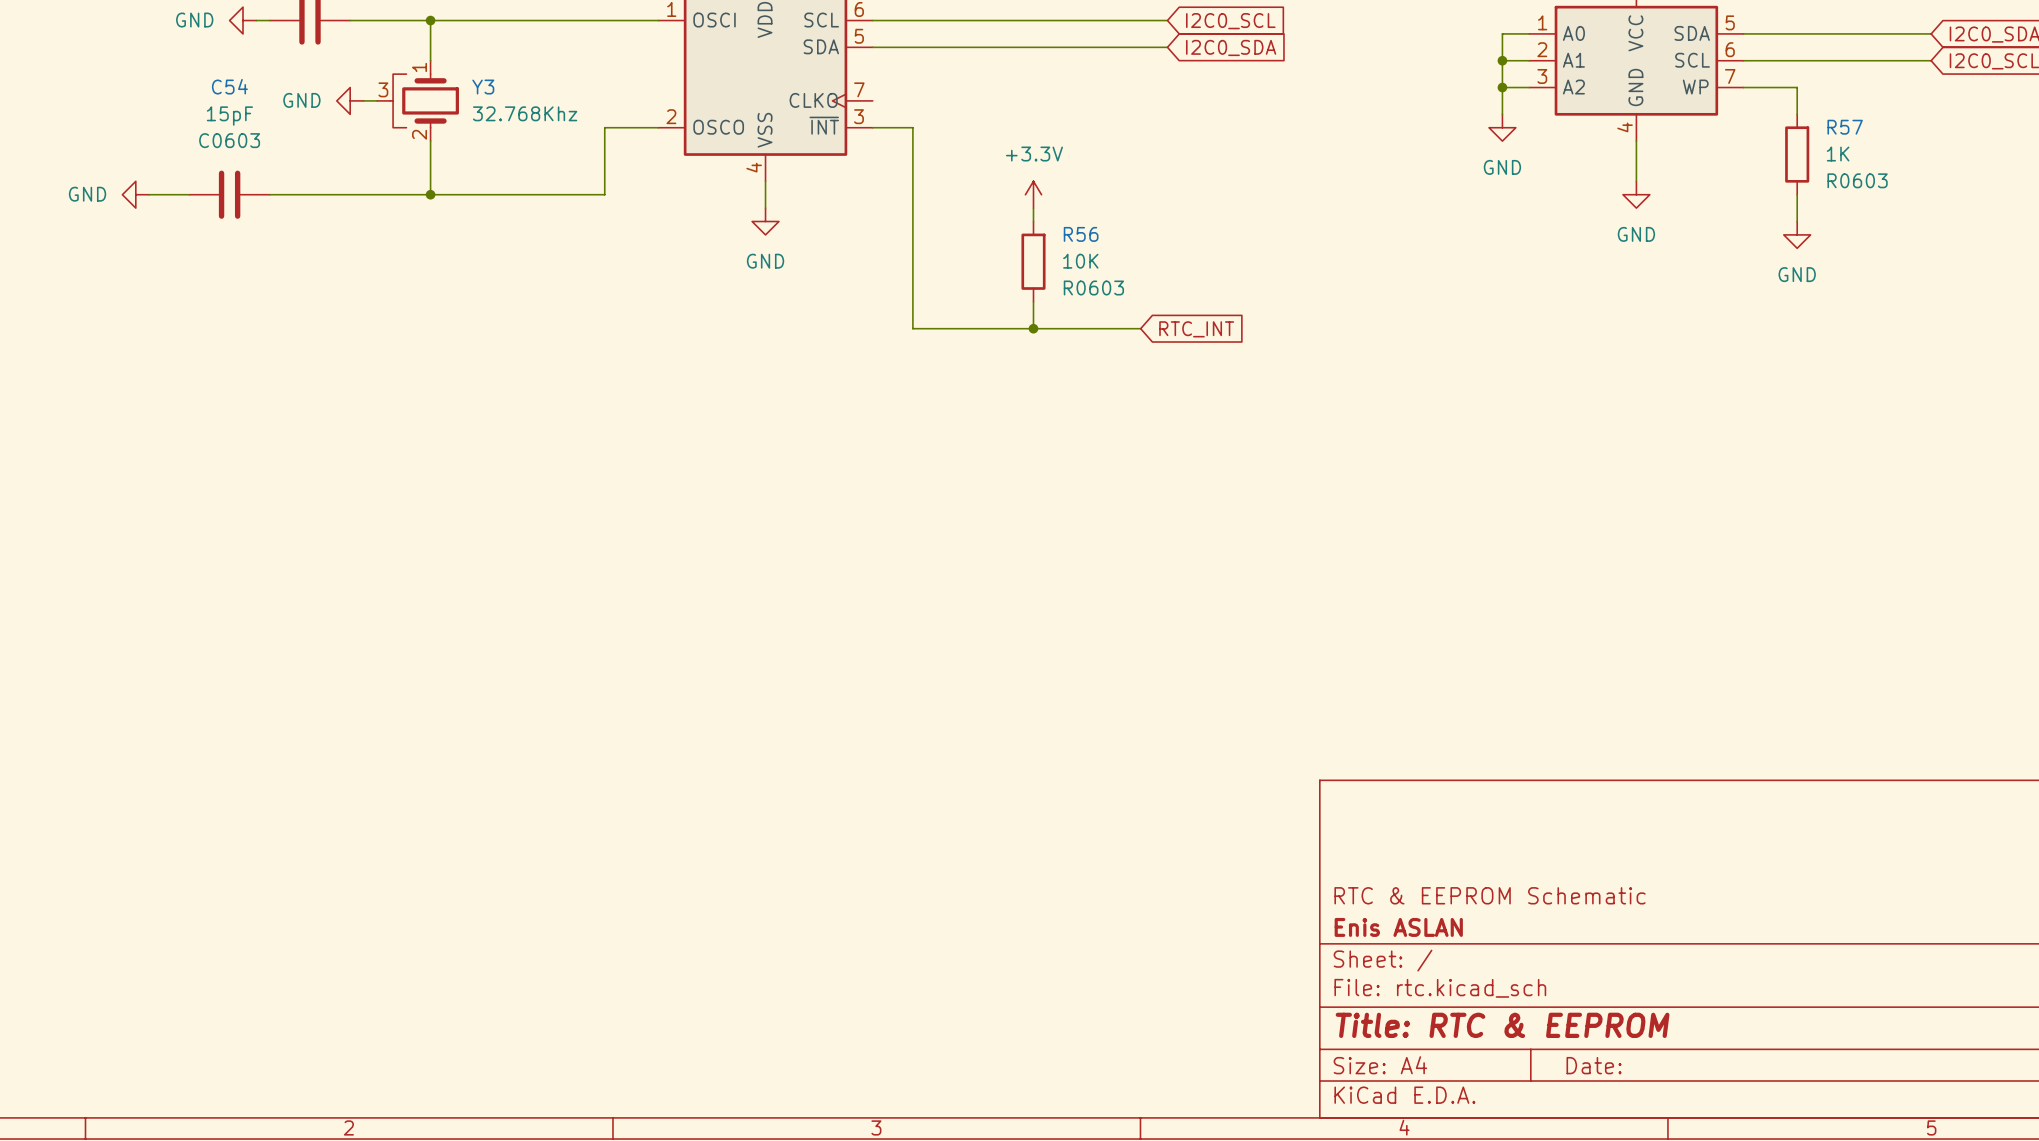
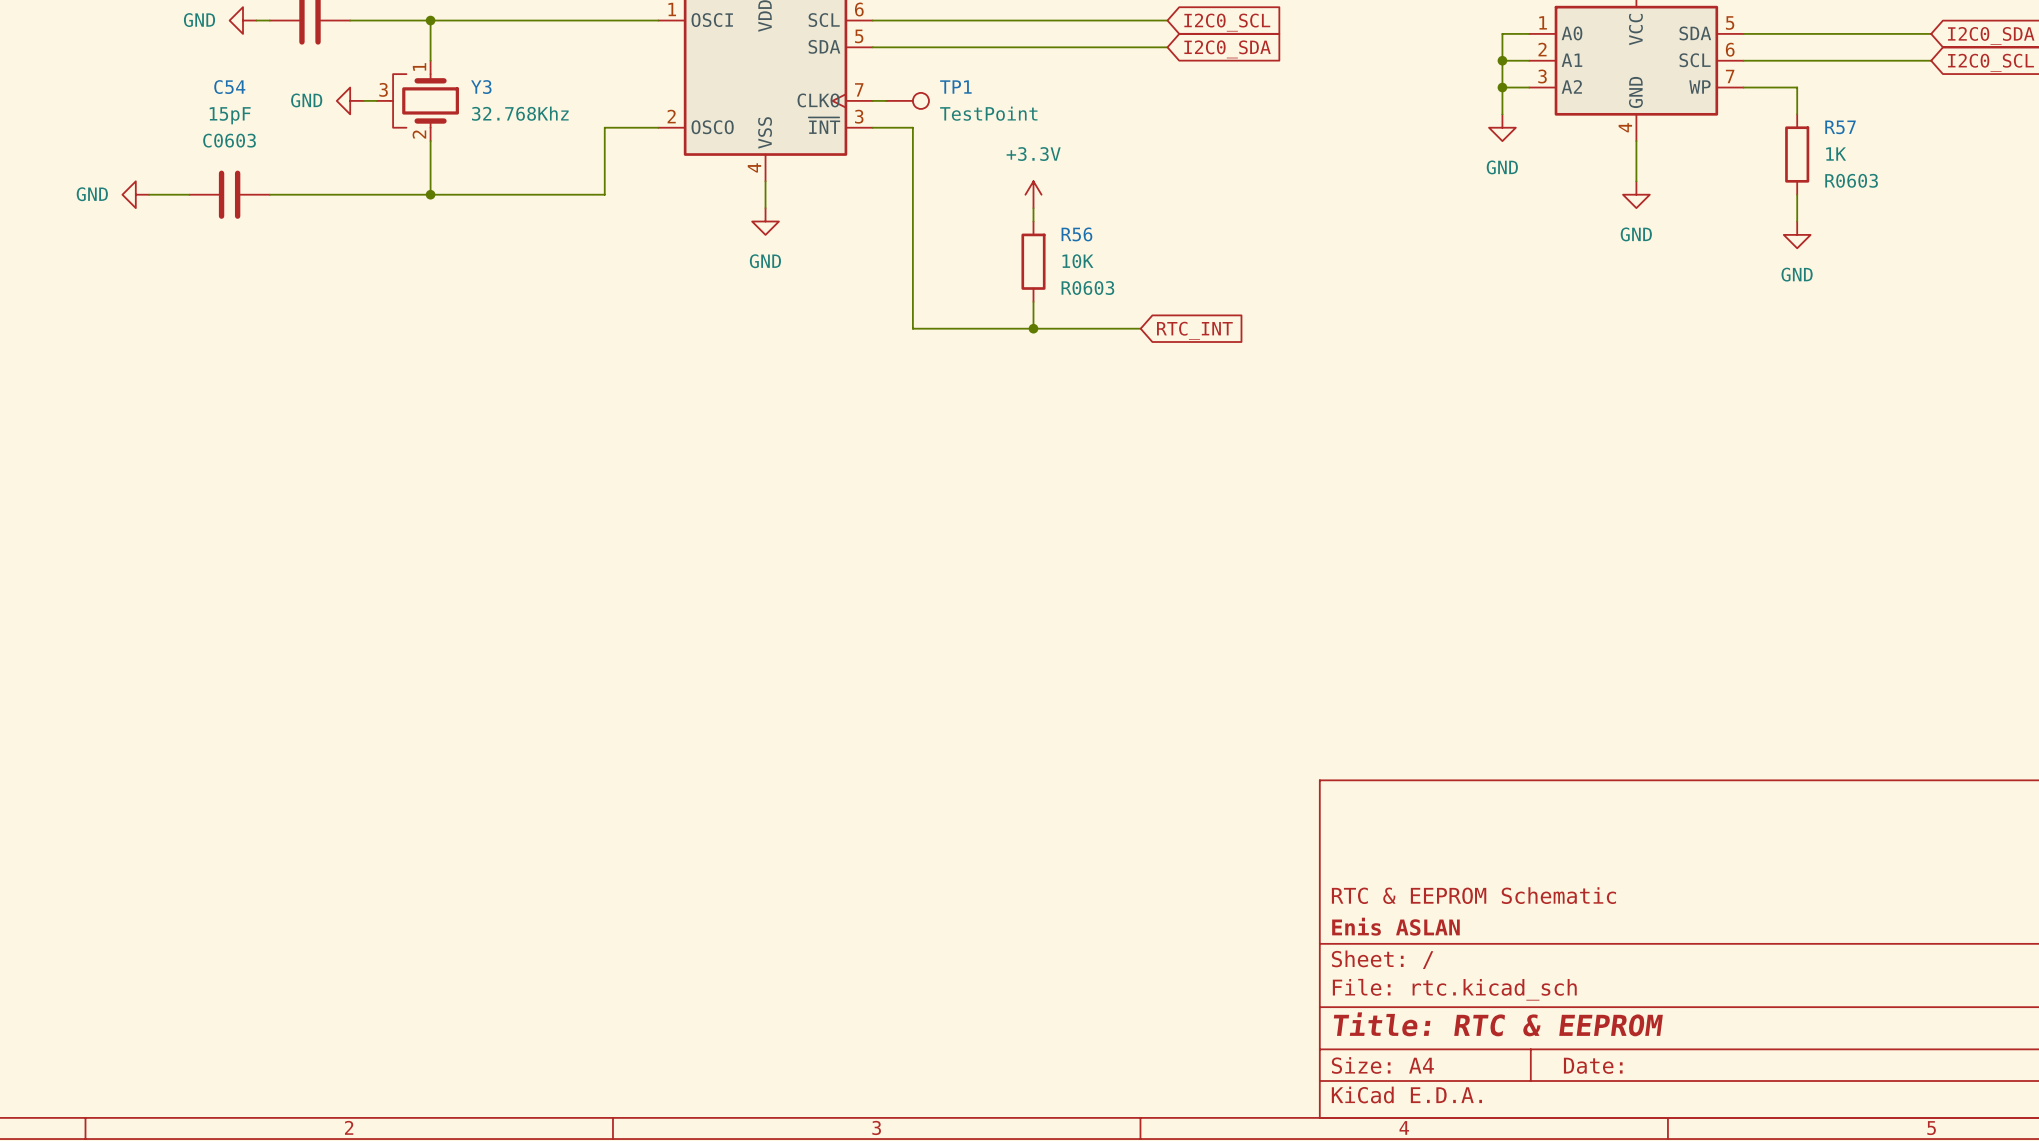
wire: none -> (872, 100) (886, 100)
TP1: none -> TestPoint (907, 100)

